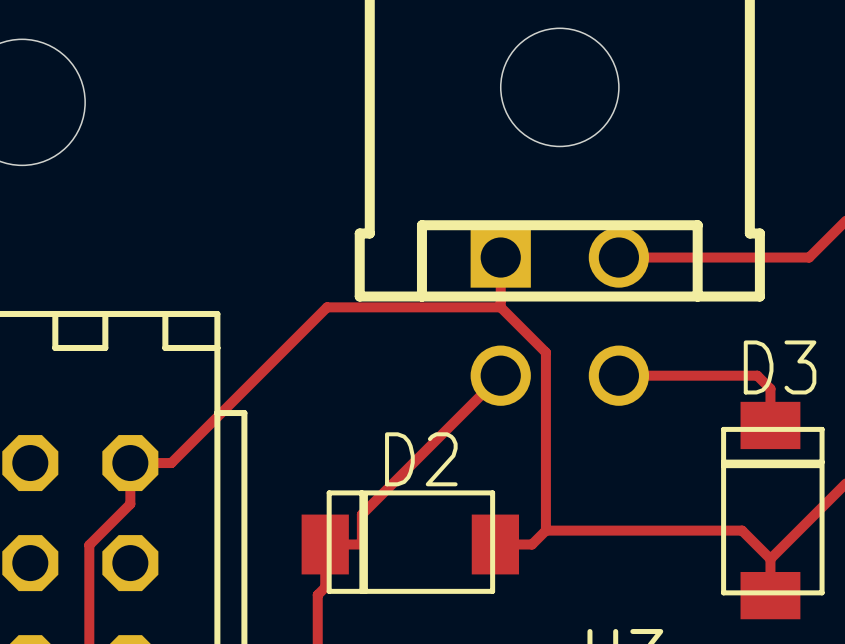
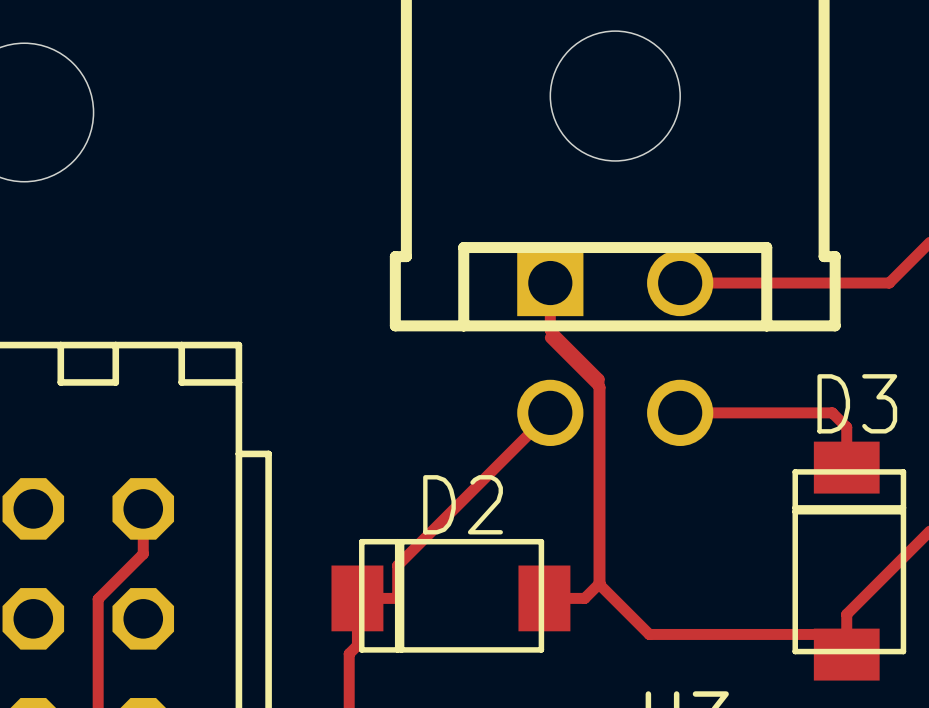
track: (500, 300) (500, 307) (327, 307) (171, 463) (130, 463) -> (550, 330) (599, 379) (599, 584) (649, 634) (846, 634)
track: (545, 530) (742, 530) (770, 558) -> none

